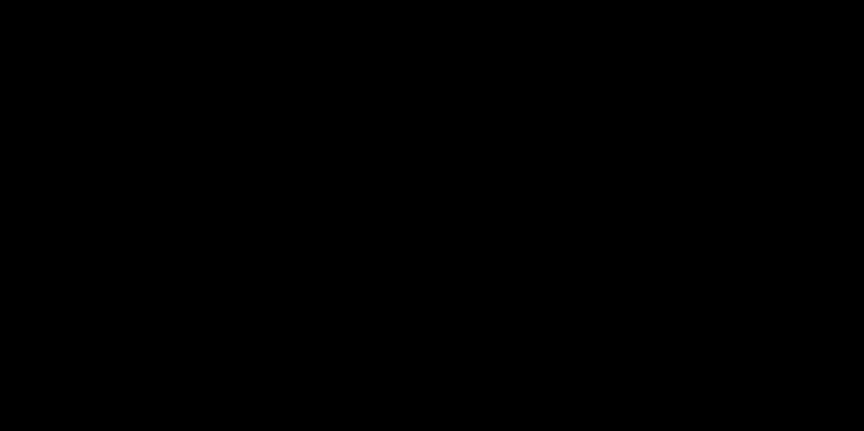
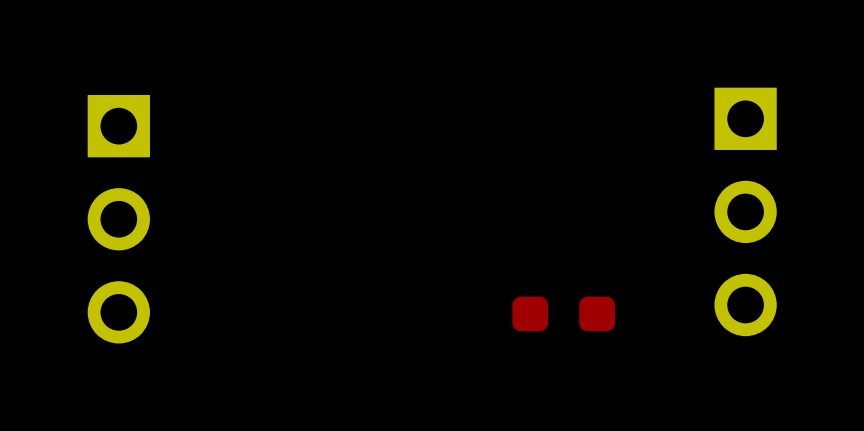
part: none -> (745, 211)
part: none -> (118, 219)
part: none -> (563, 314)

